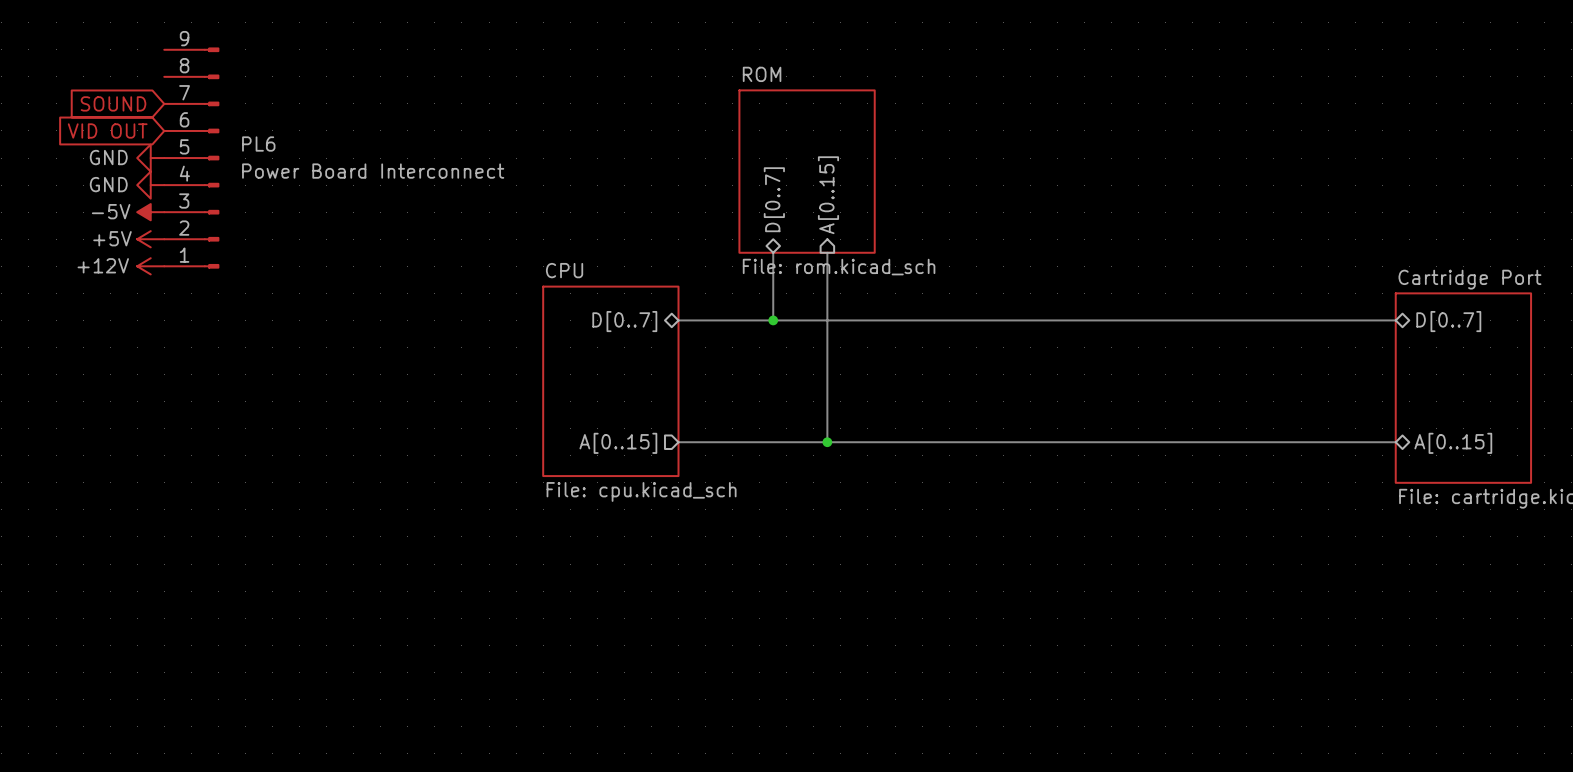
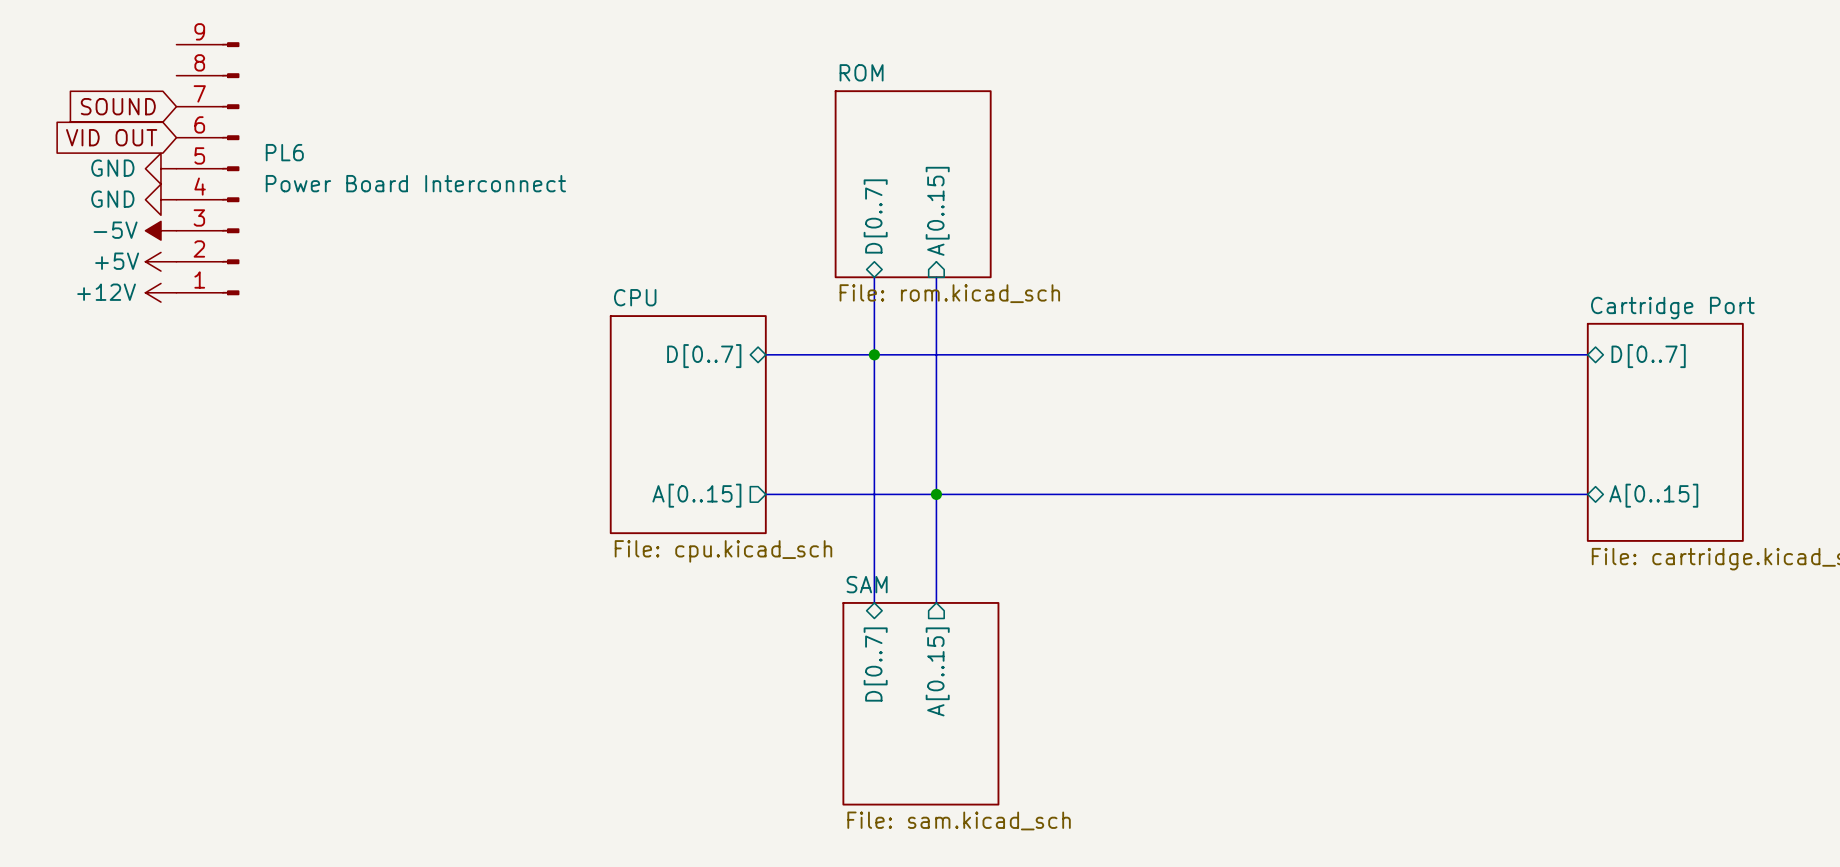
bus: none -> (874, 354) (874, 602)
bus: none -> (936, 494) (936, 602)
sheet pin: none -> D[0..7] (875, 664)
sheet pin: none -> A[0..15] (937, 671)
sheet SAM: none -> File: sam.kicad_sch (920, 703)

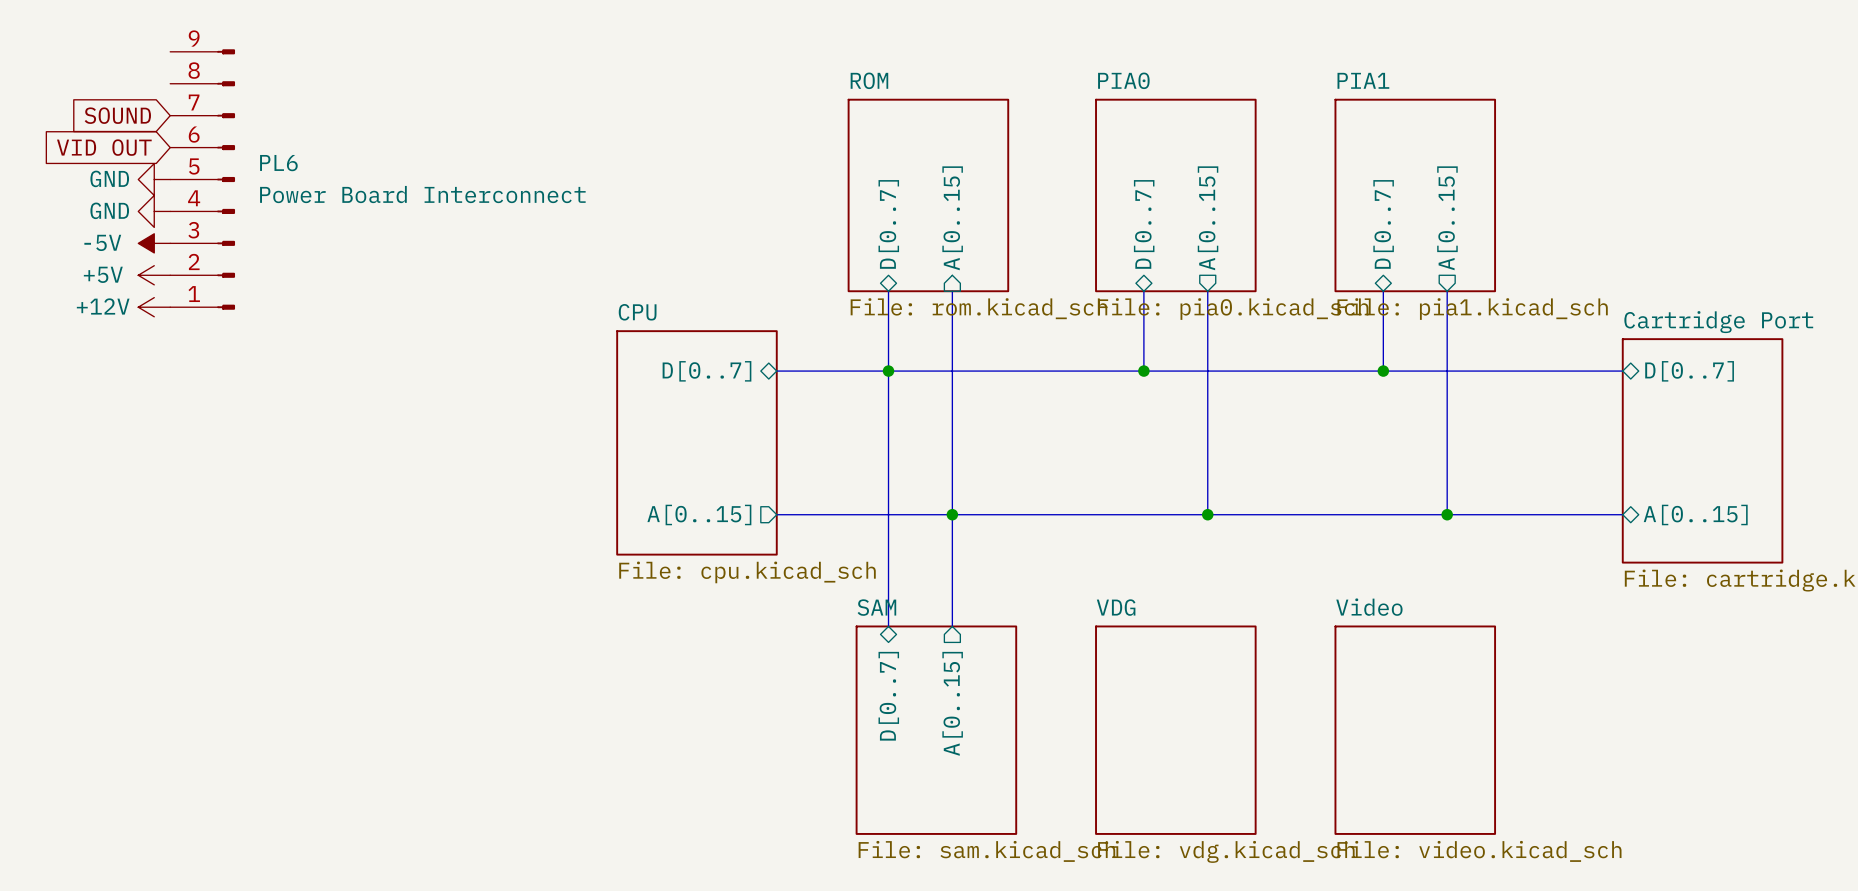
sheet PIA0: none -> File: pia0.kicad_sch (1175, 195)
sheet PIA1: none -> File: pia1.kicad_sch (1415, 195)
sheet pin: none -> A[0..15] (1208, 218)
sheet pin: none -> A[0..15] (1447, 218)
sheet pin: none -> D[0..7] (1144, 224)
sheet pin: none -> D[0..7] (1383, 224)
bus: none -> (1143, 291) (1143, 371)
bus: none -> (1207, 291) (1207, 514)
bus: none -> (1383, 291) (1383, 371)
bus: none -> (1447, 291) (1447, 514)
junction: none -> (1143, 371)
junction: none -> (1383, 371)
junction: none -> (1207, 514)
junction: none -> (1447, 514)
sheet VDG: none -> File: vdg.kicad_sch (1175, 730)
sheet Video: none -> File: video.kicad_sch (1415, 730)

